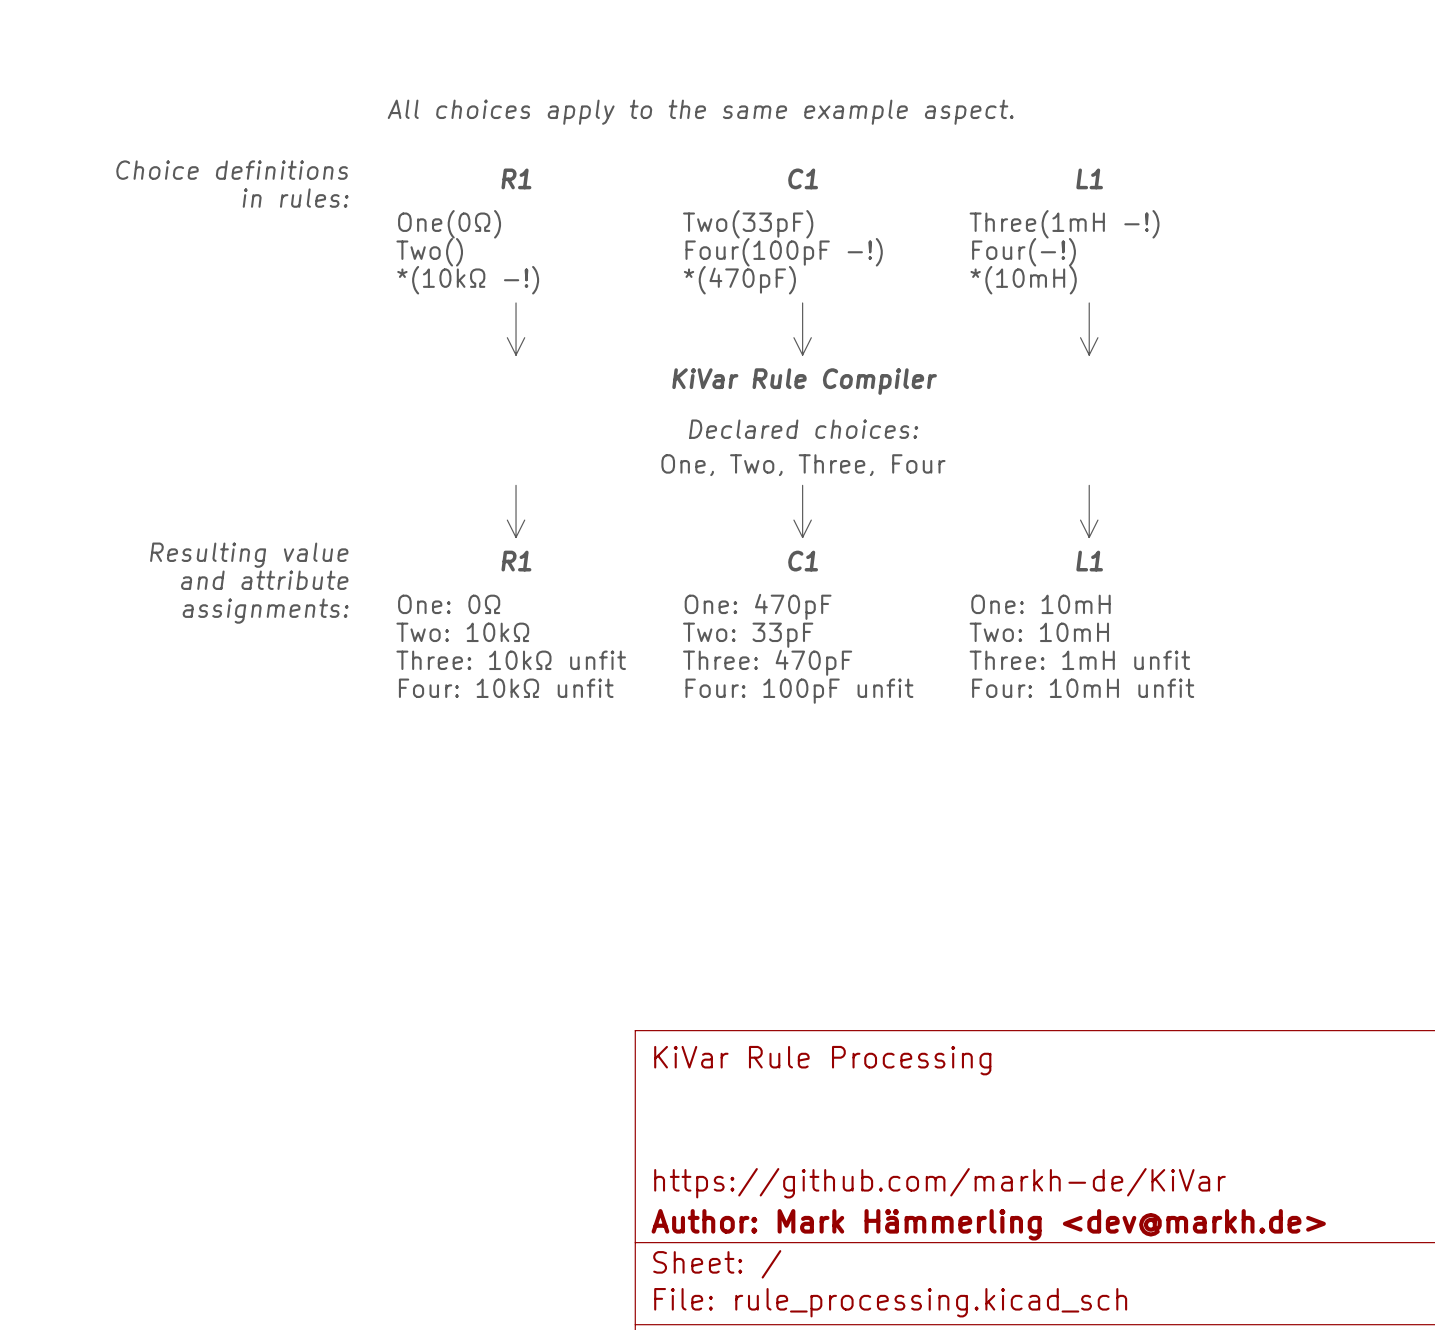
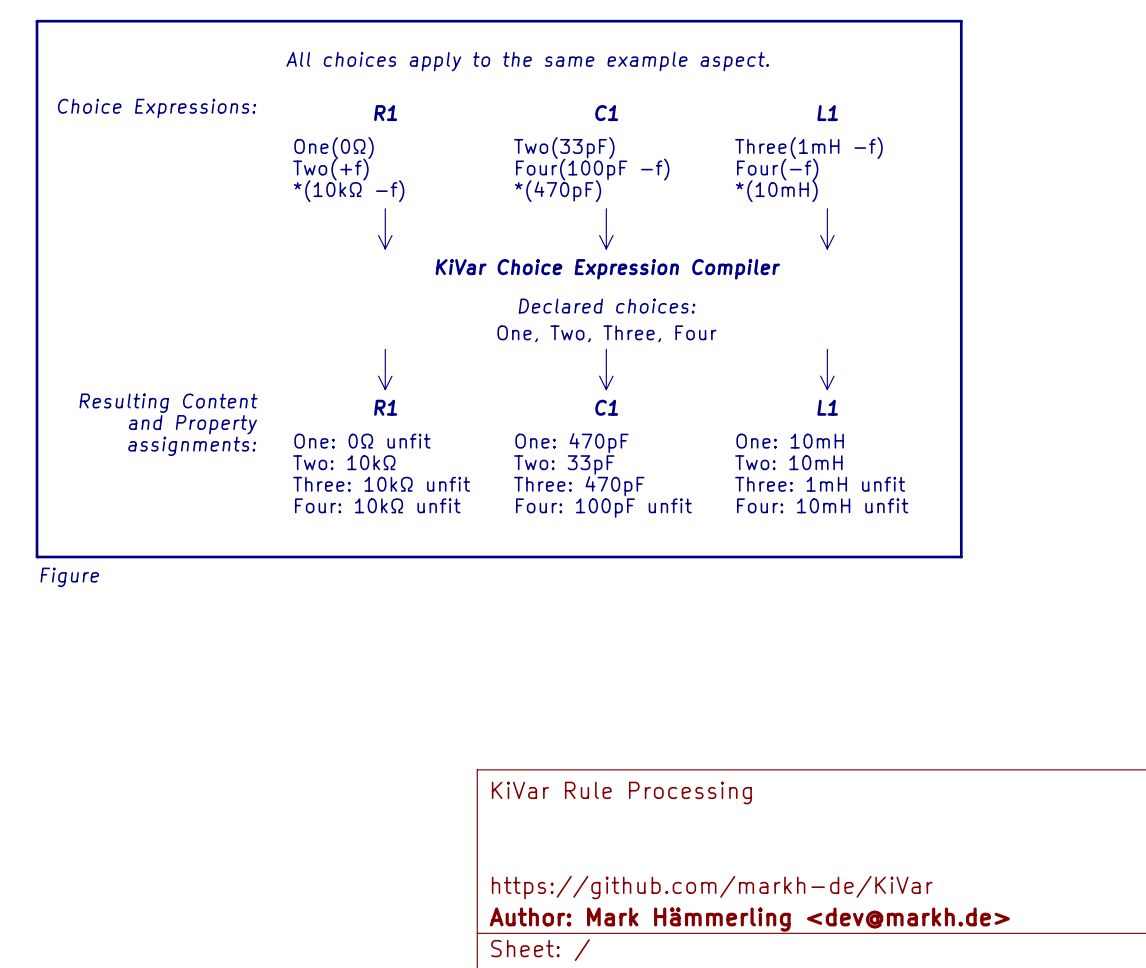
line: none -> (37, 21) (961, 21) (961, 557) (37, 557) (37, 21)
text: Choice definitions (232, 170) -> Choice Expressions: (157, 108)
text: in rules: (295, 198) -> none
text: Three(1mH -!) (1064, 224) -> Three(1mH -f) (808, 148)
text: Two() (429, 252) -> Two(+f) (330, 169)
text: Four(100pF -!) (784, 252) -> Four(100pF -f) (592, 169)
text: Four(-!) (1024, 252) -> Four(-f) (777, 169)
text: *(10kΩ -!) (468, 280) -> *(10kΩ -f) (349, 191)
text: KiVar Rule Compiler (804, 381) -> KiVar Choice Expression Compiler (607, 269)
text: Resulting value (249, 555) -> Resulting Content (168, 403)
text: and attribute (264, 580) -> and Property (192, 424)
text: One: 0Ω (449, 604) -> One: 0Ω unfit (362, 441)
text: none -> Figure (69, 577)

